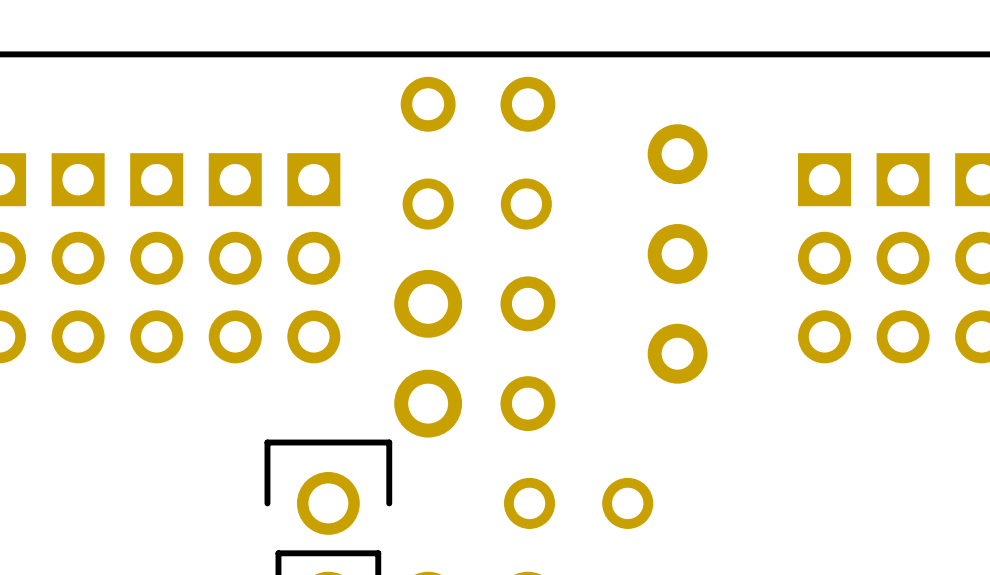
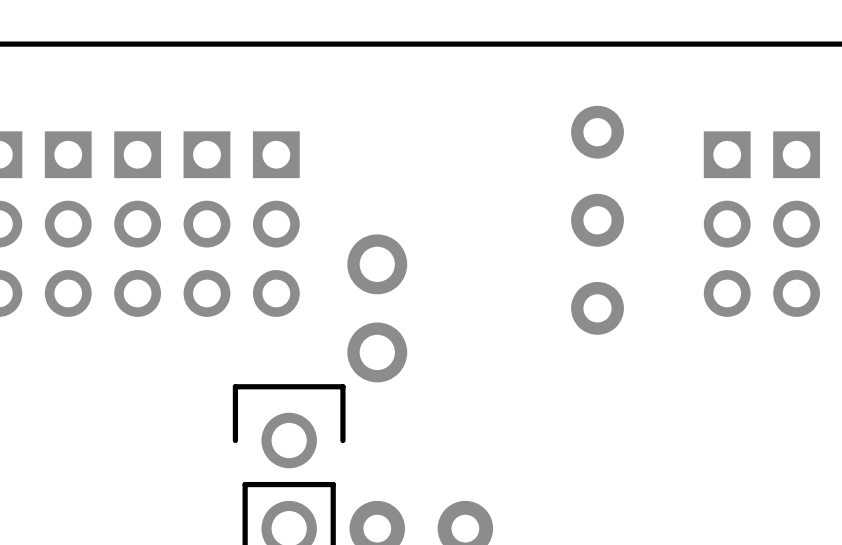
part: (478, 104) -> none
part: (477, 204) -> none
part: (527, 353) -> none
part: (578, 503) -> none

